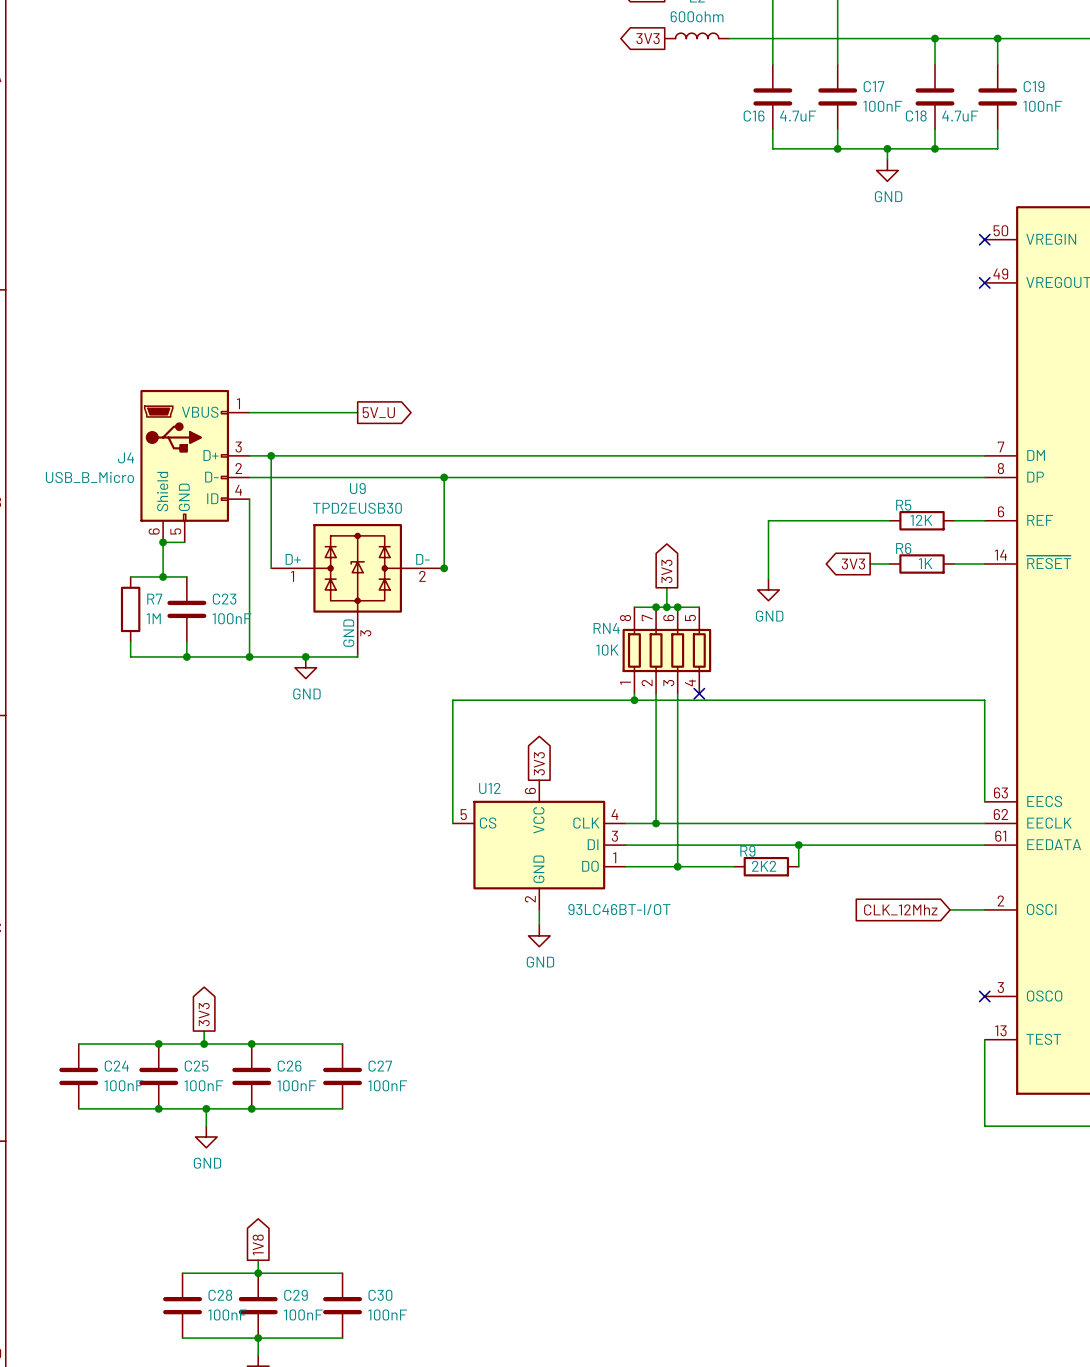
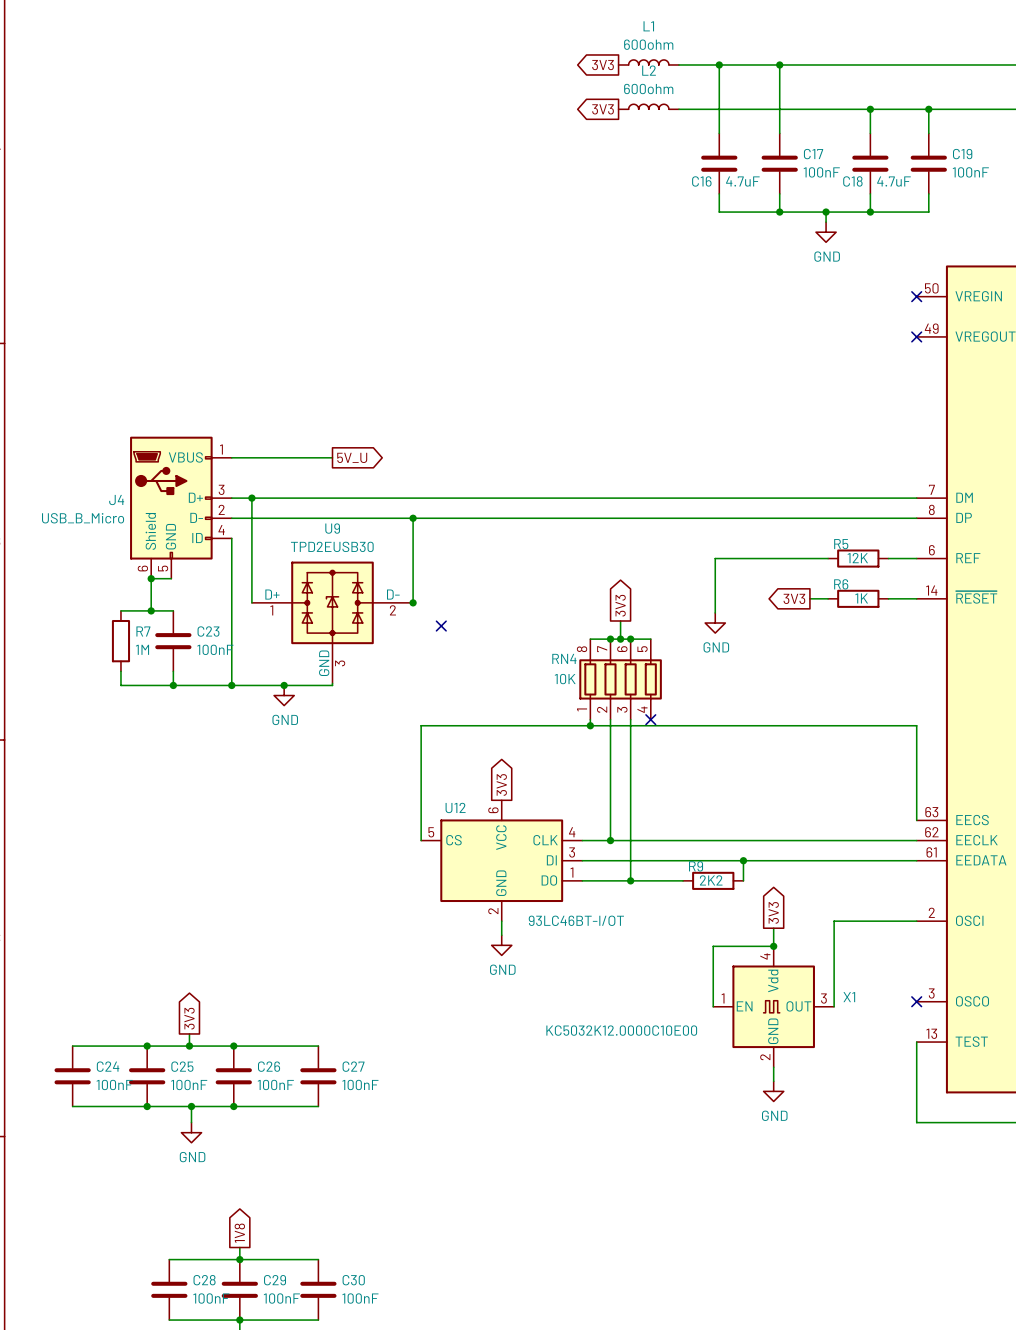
no-connect mark: none -> (441, 626)
global label: none -> 3V3 (773, 912)
global label: CLK_12Mhz (900, 909) -> none
wire: none -> (884, 921) (834, 921) (834, 1006)
wire: none -> (773, 928) (773, 946) (713, 946) (713, 1006)
junction: none -> (773, 946)
X1: none -> KC5032K12.0000C10E00 (773, 1006)
wire: none -> (773, 1067) (773, 1081)
power symbol: none -> GND (773, 1091)

